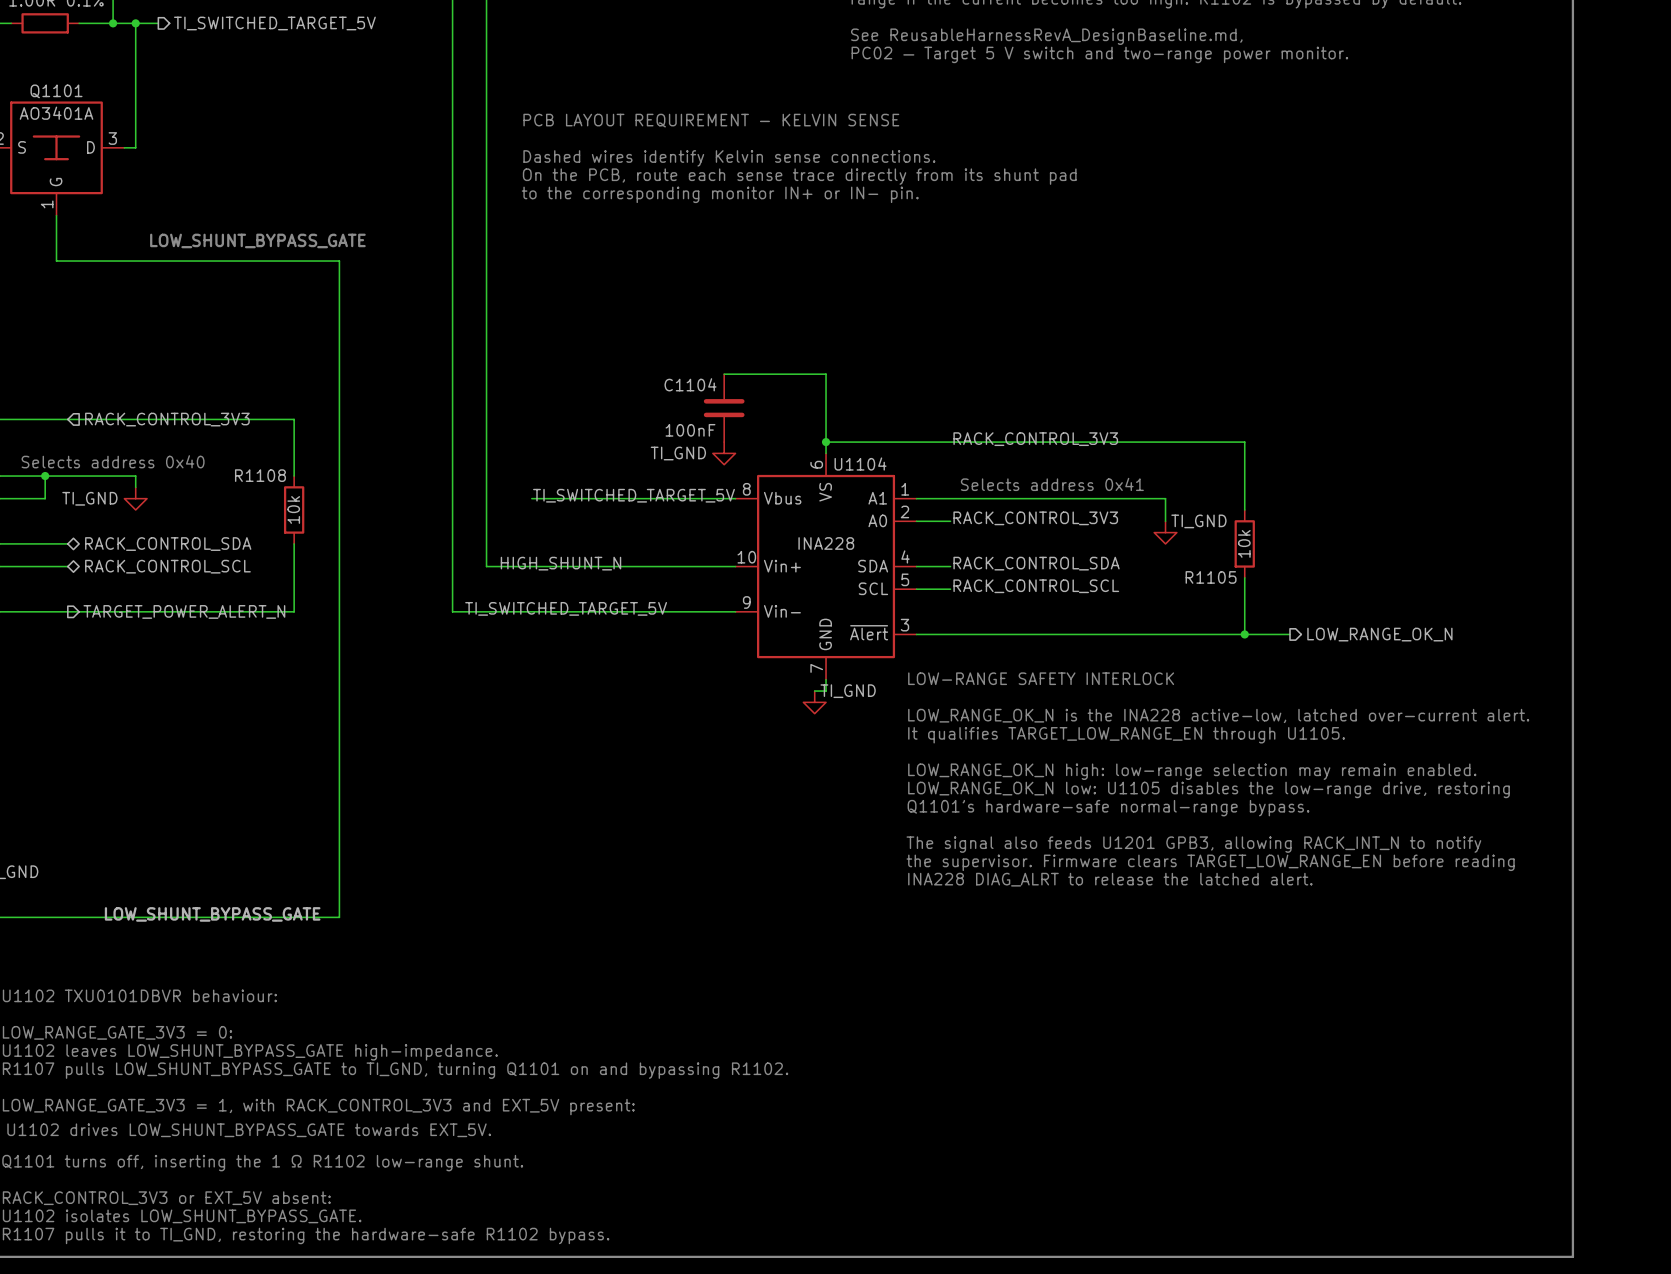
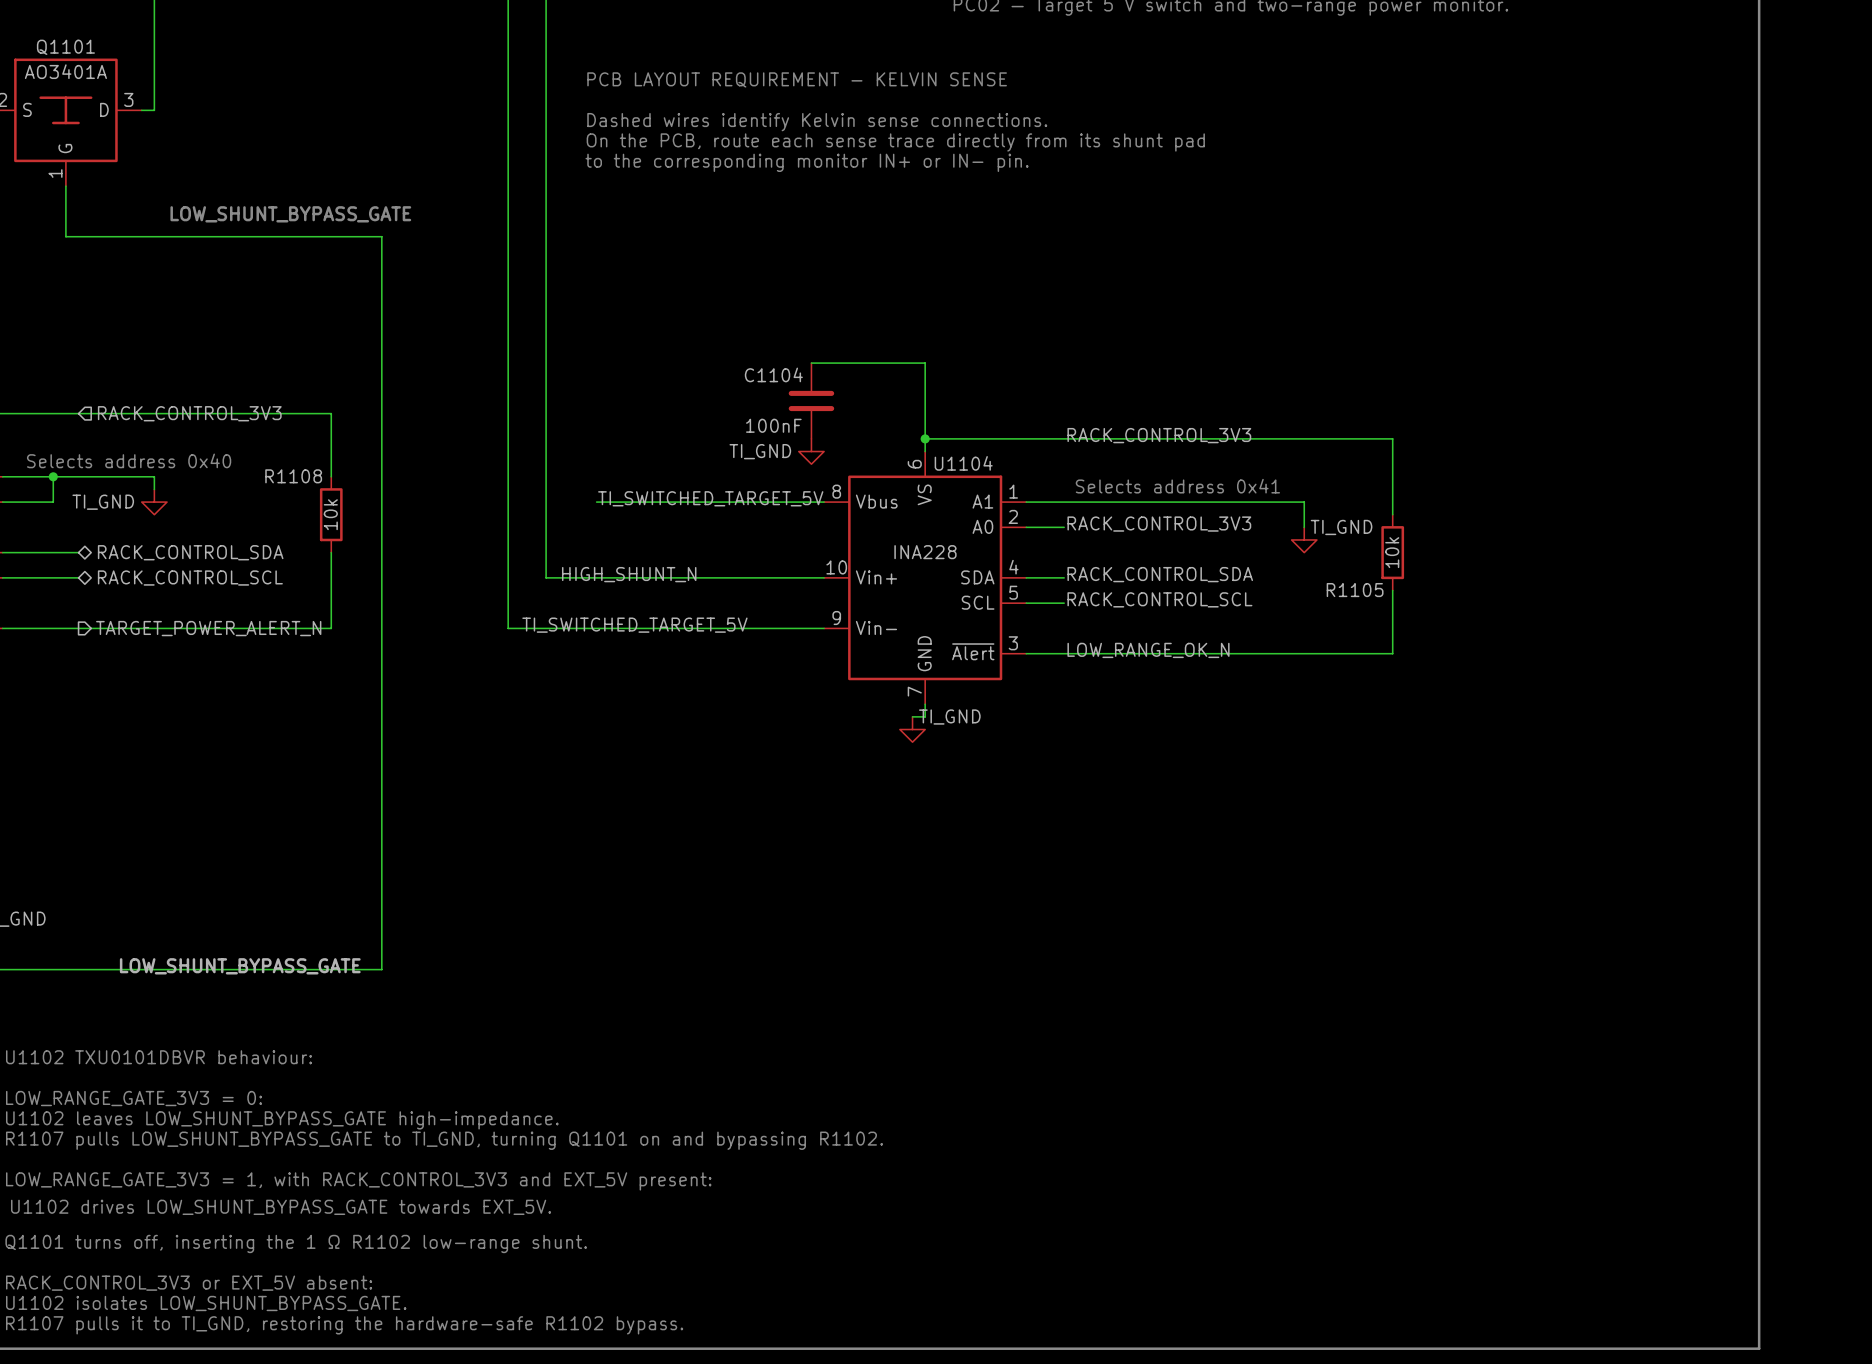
label: none -> LOW_RANGE_OK_N (1148, 650)
wire: (1244, 634) (1290, 634) -> none
junction: (1244, 634) -> none
hierarchical label: LOW_RANGE_OK_N (1379, 634) -> none
text: LOW-RANGE SAFETY INTERLOCK (1041, 678) -> none
text: LOW_RANGE_OK_N is the INA228 active-low, latched over-current alert. (1218, 715) -> none
text: It qualifies TARGET_LOW_RANGE_EN through U1105. (1126, 735) -> none
text: LOW_RANGE_OK_N high: low-range selection may remain enabled. (1192, 771) -> none
text: LOW_RANGE_OK_N low: U1105 disables the low-range drive, restoring (1208, 789) -> none
text: Q1101’s hardware-safe normal-range bypass. (1108, 808) -> none
text: The signal also feeds U1201 GPB3, allowing RACK_INT_N to notify (1193, 844) -> none
text: the supervisor. Firmware clears TARGET_LOW_RANGE_EN before reading (1210, 862) -> none
text: INA228 DIAG_ALRT to release the latched alert. (1110, 879) -> none

